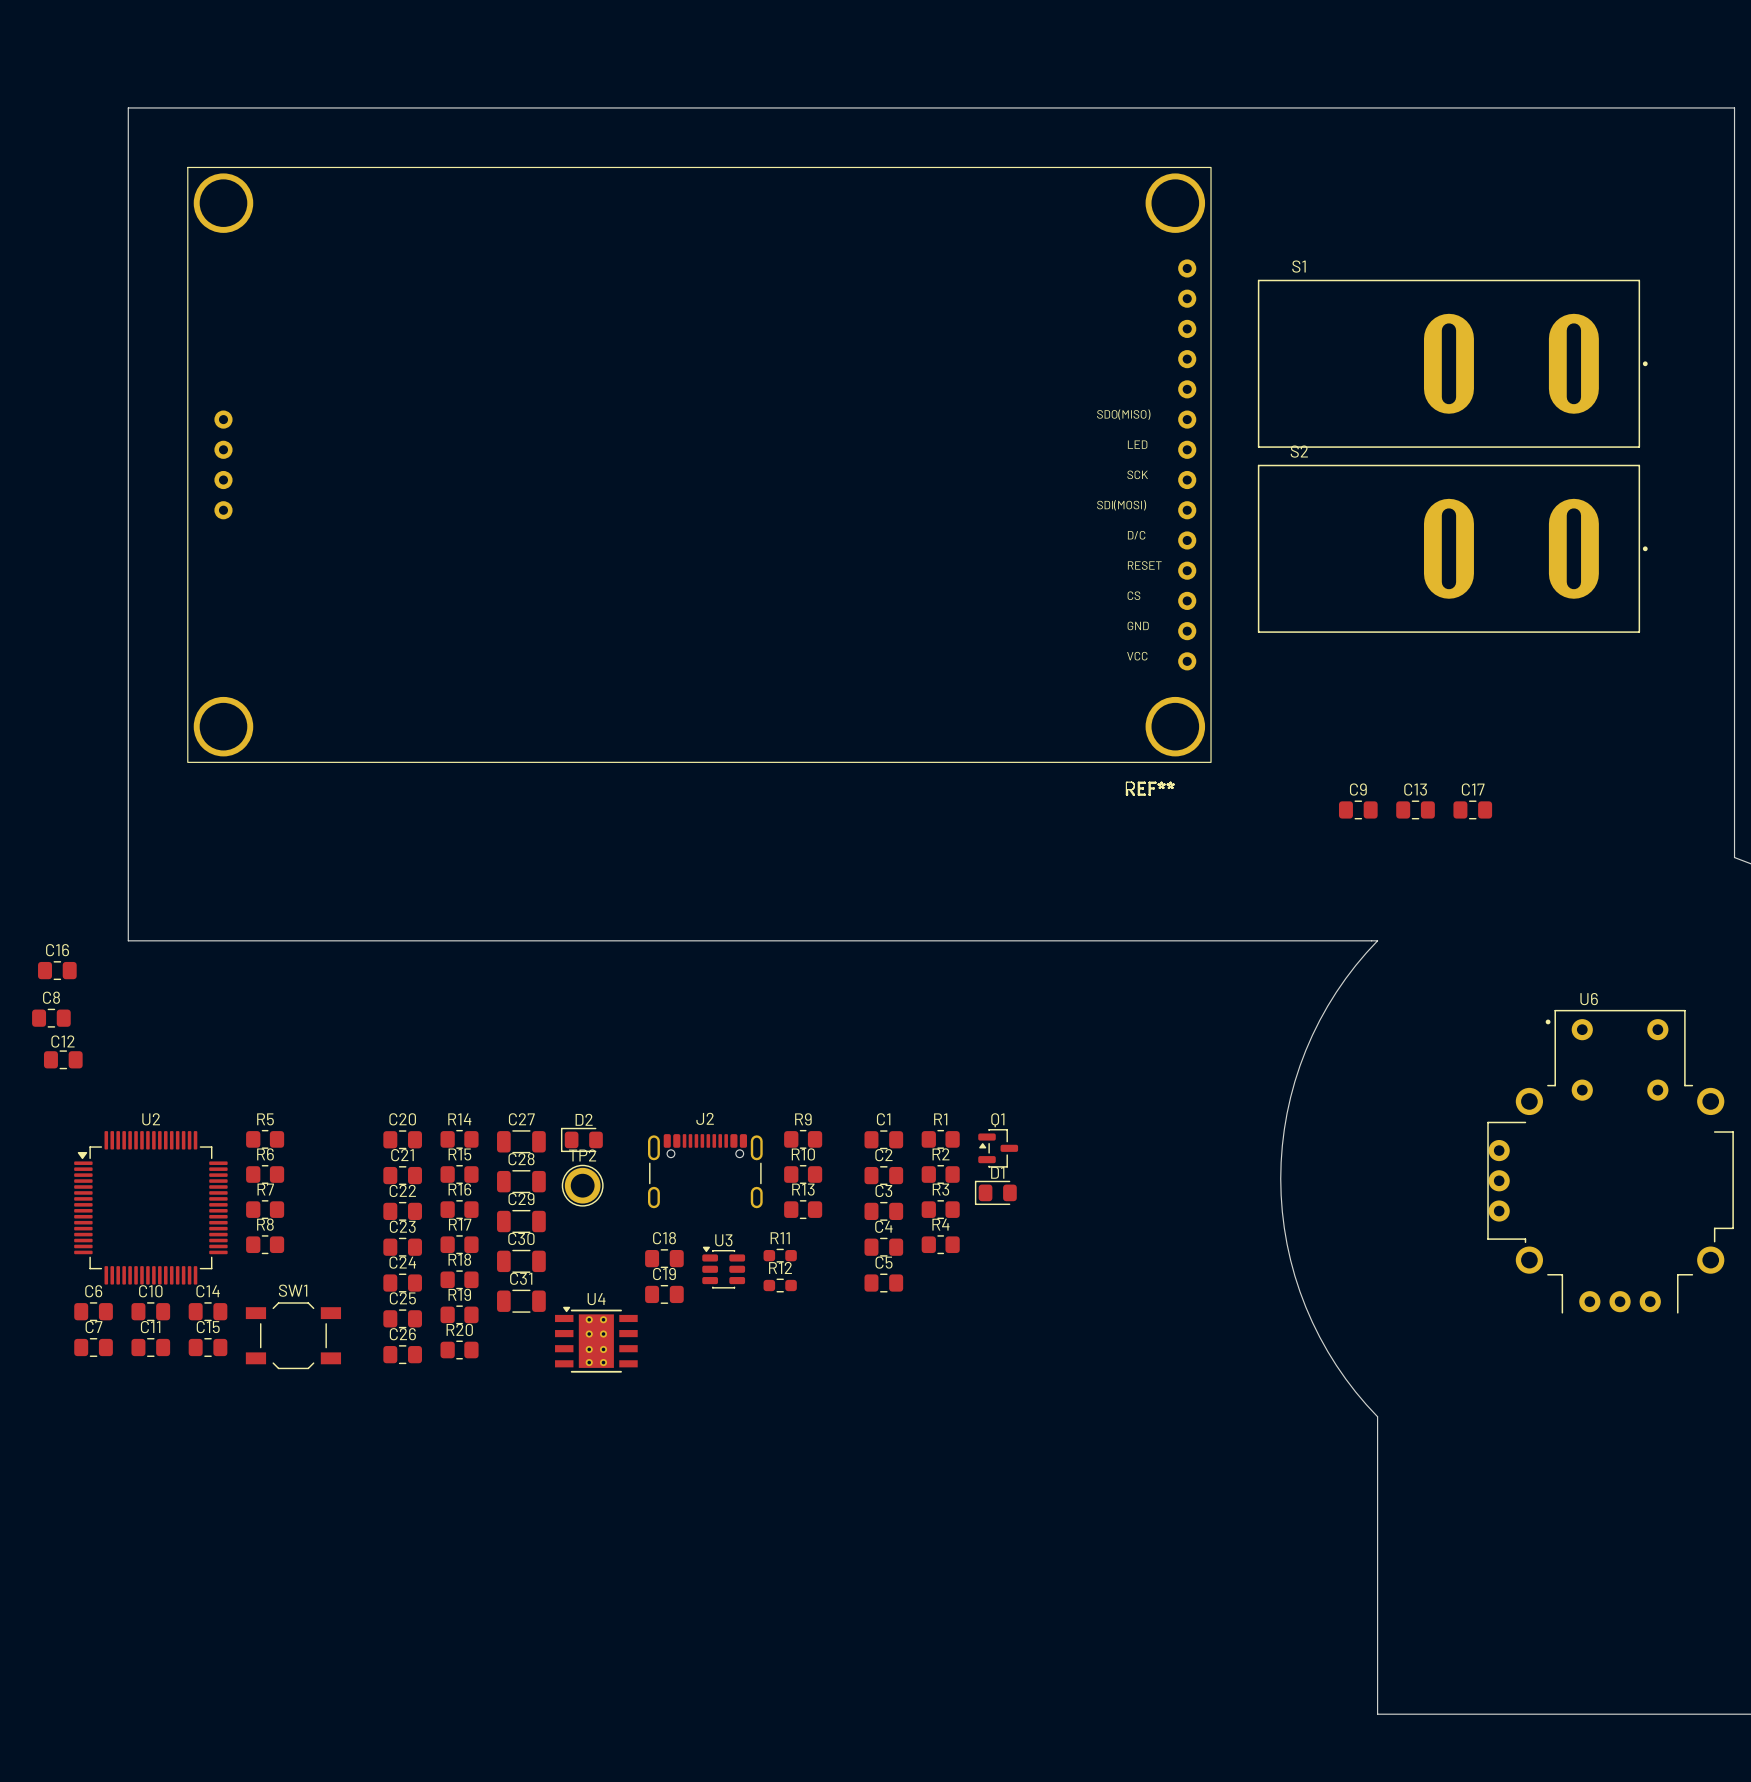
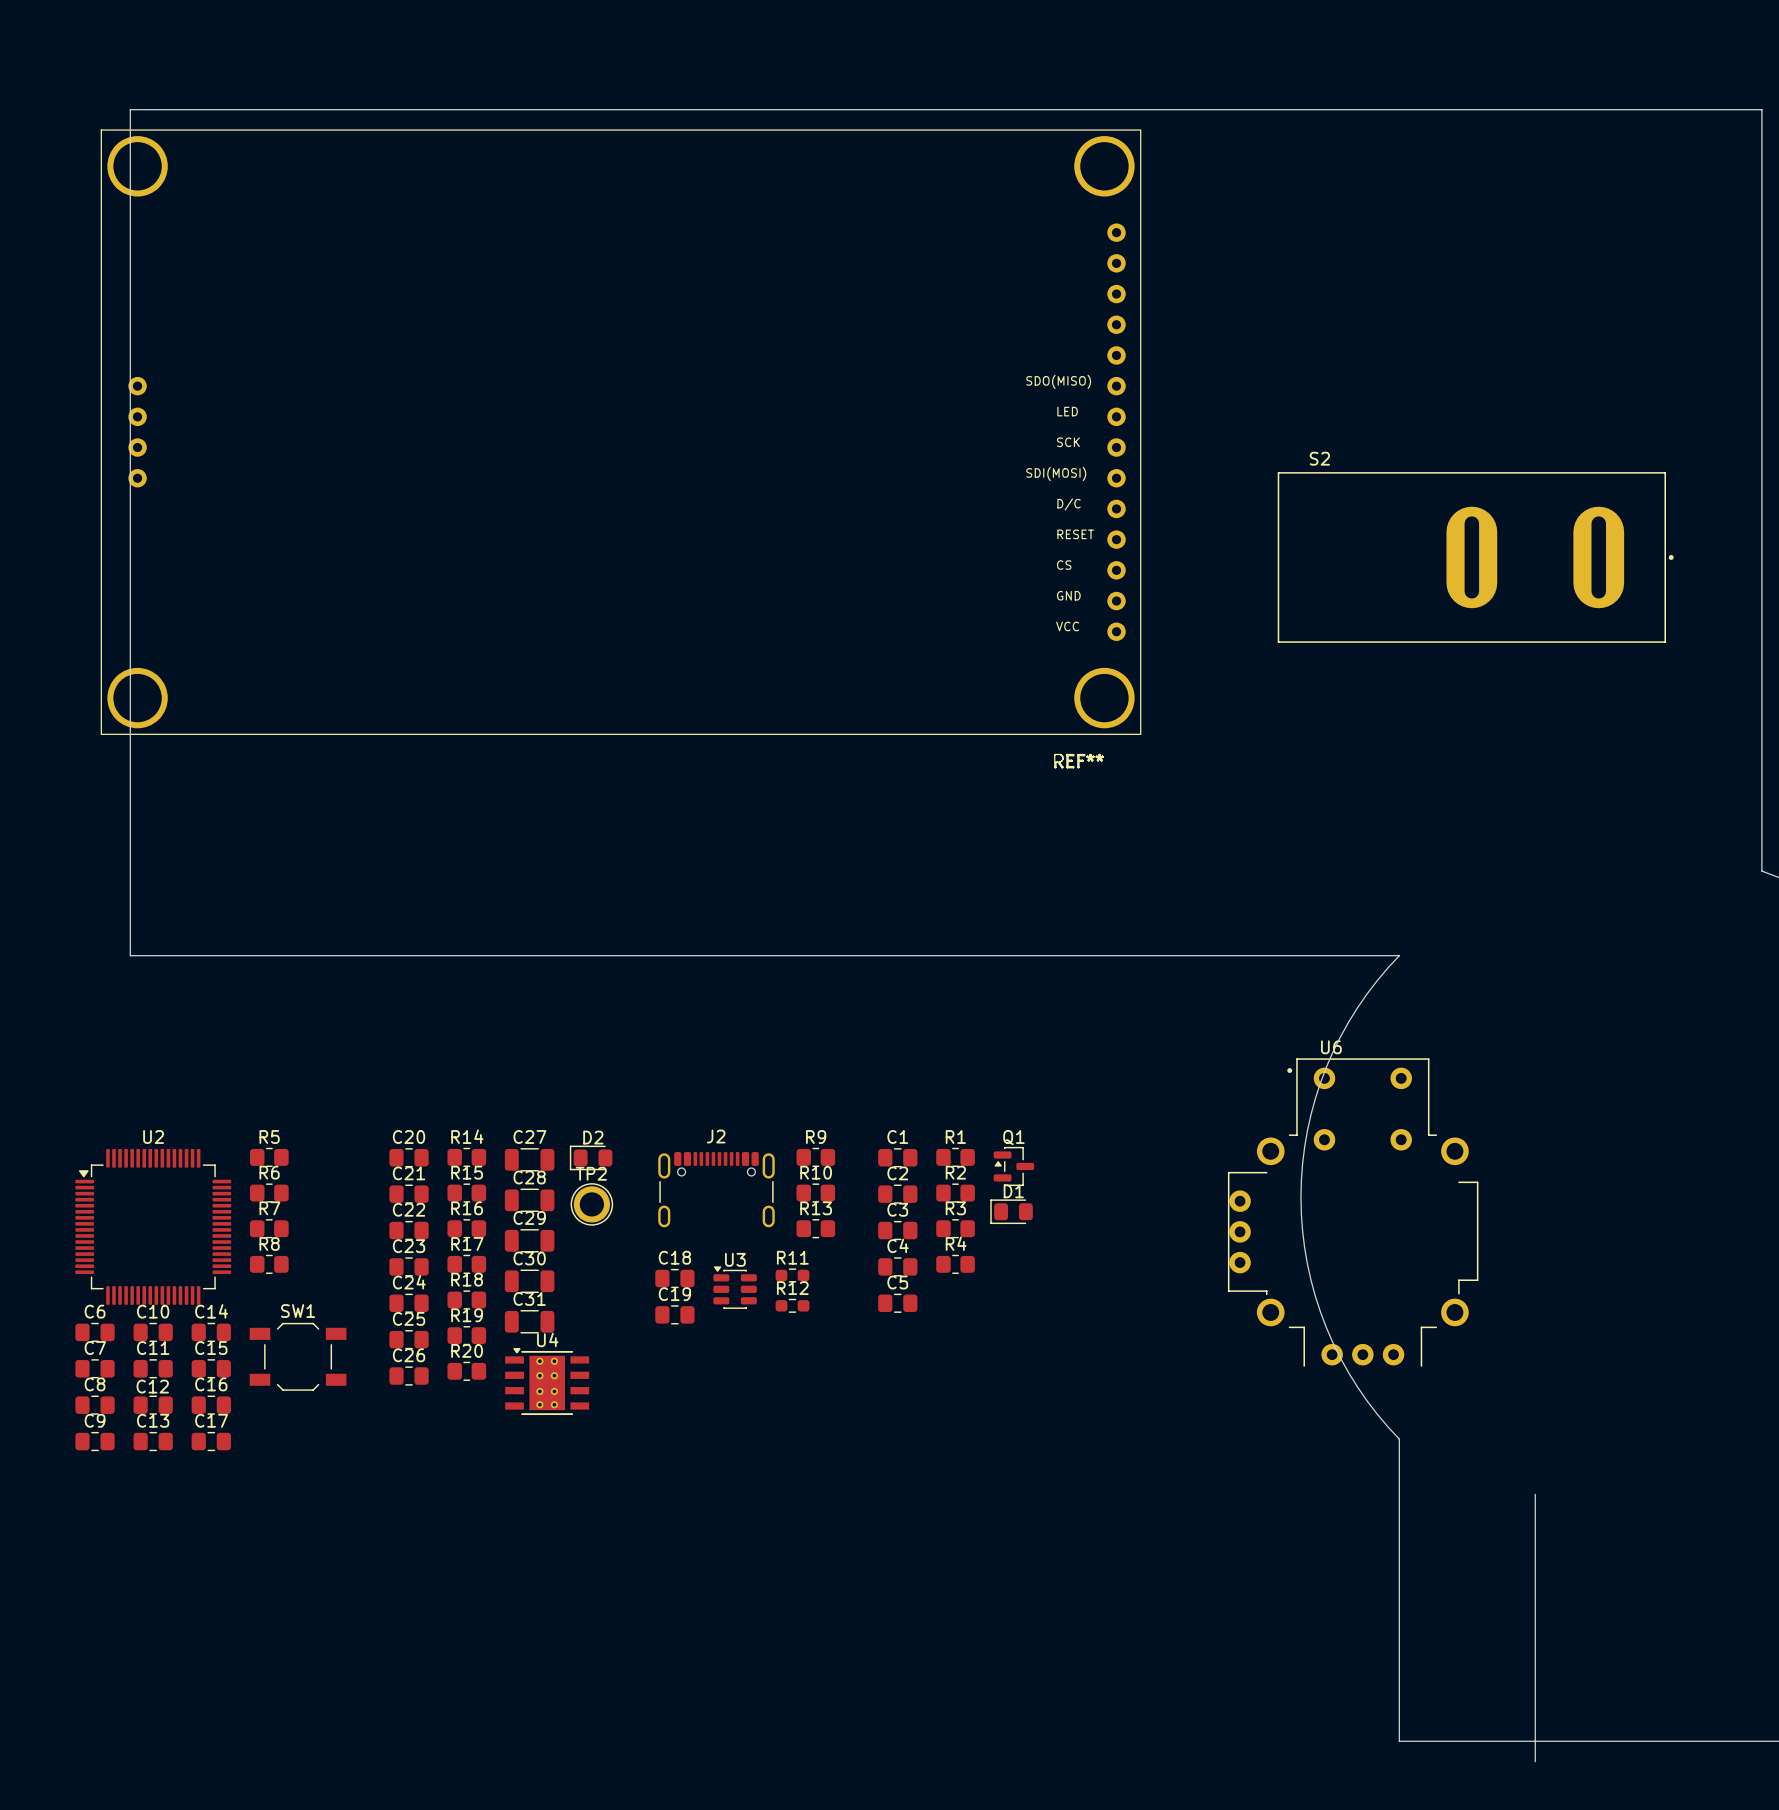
S1: (1452, 363) -> none
part position: (699, 481) -> (621, 448)
C9 position: (1358, 809) -> (95, 1441)
C13 position: (1415, 809) -> (153, 1441)
C17 position: (1472, 809) -> (211, 1441)
C16 position: (57, 970) -> (211, 1405)
C8 position: (51, 1018) -> (95, 1405)
C12 position: (63, 1059) -> (153, 1405)
U6 position: (1610, 1161) -> (1353, 1212)
U4 position: (596, 1339) -> (547, 1381)
board edge: none -> (1535, 1494) (1535, 1761)

